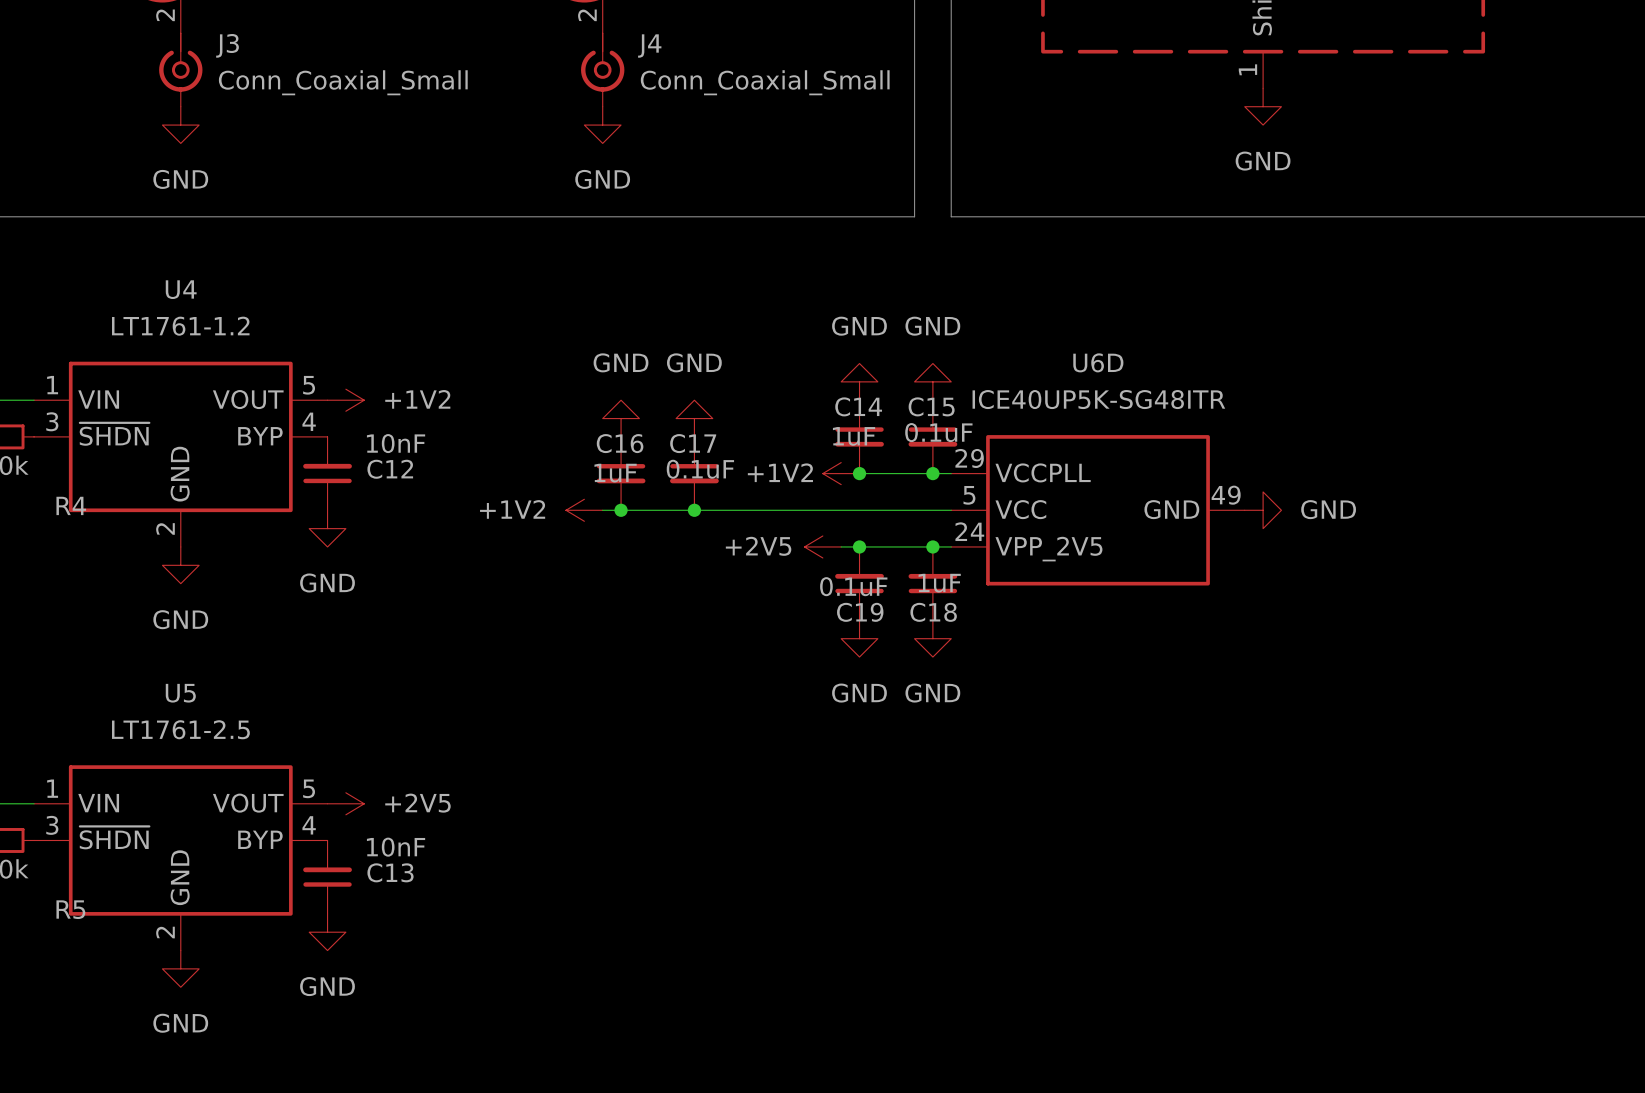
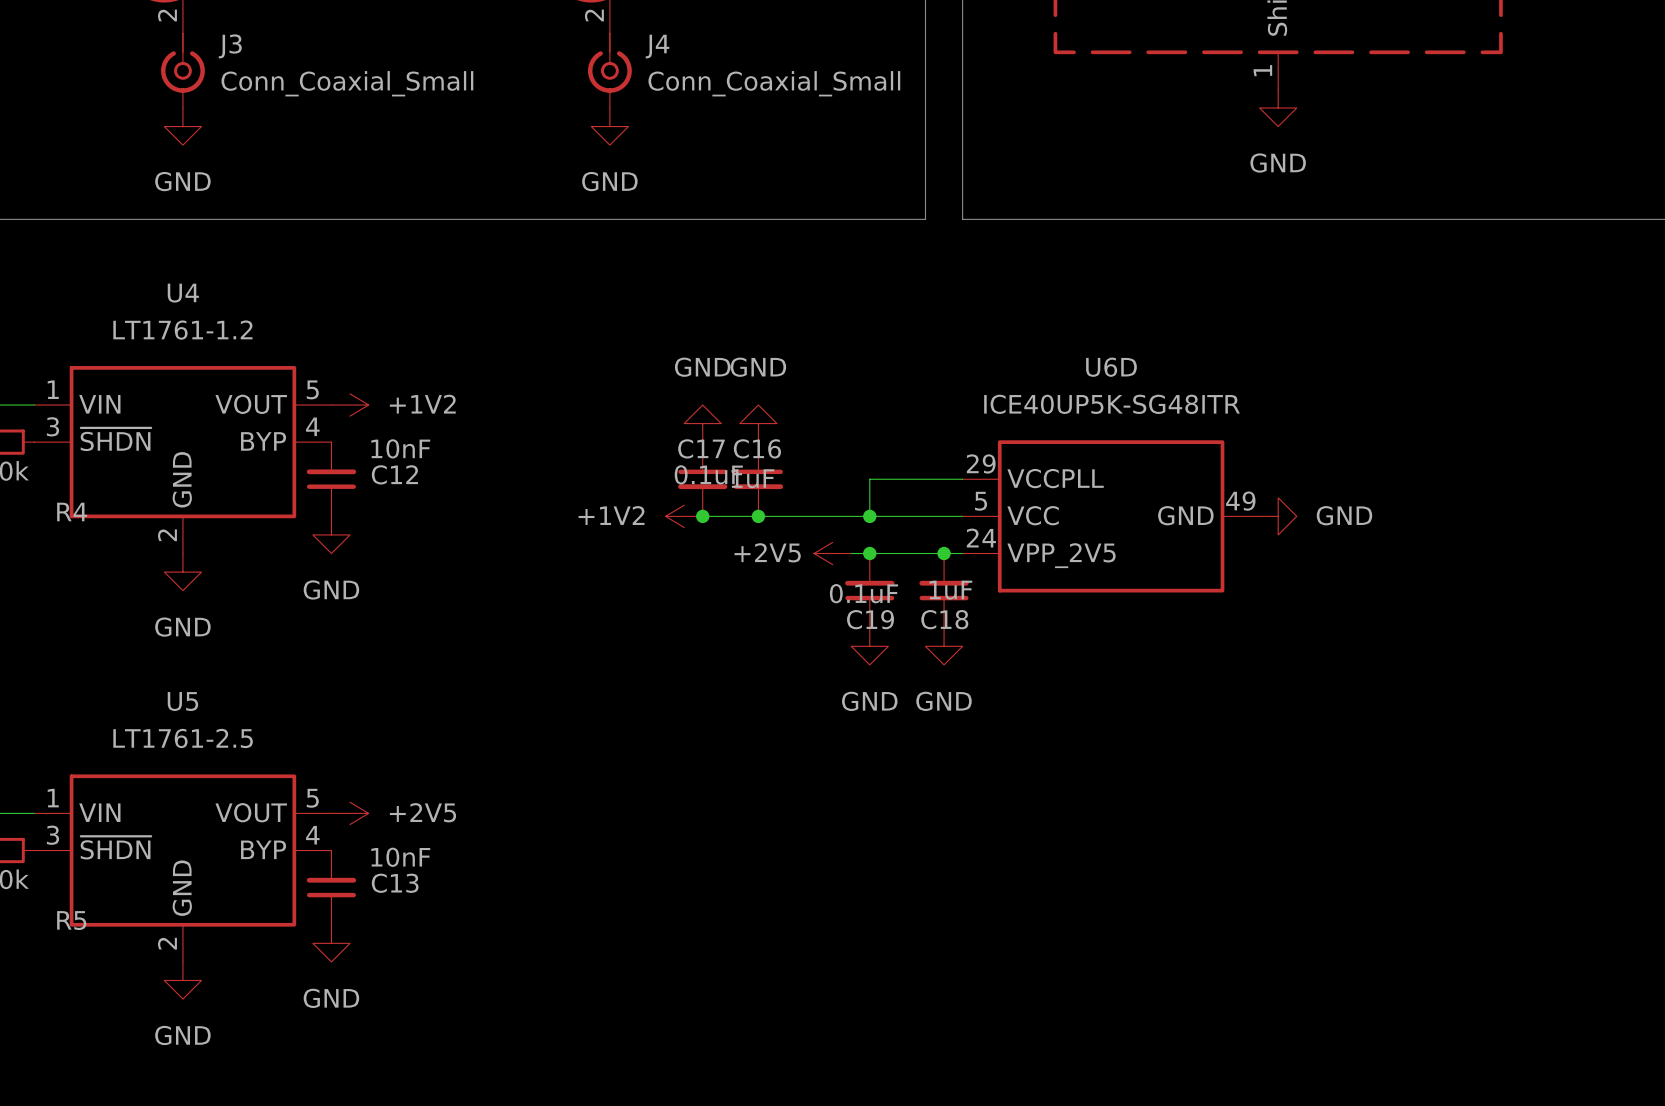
power symbol: GND (859, 381) -> none
power symbol: GND (932, 381) -> none
power symbol: GND (621, 418) -> none
power symbol: none -> GND (758, 423)
C14: 1uF (859, 436) -> none
C15: 0.1uF (932, 436) -> none
C16 position: (621, 473) -> (758, 479)
power symbol: +1V2 (841, 473) -> none
wire: none -> (869, 479) (869, 516)
junction position: (859, 473) -> (869, 516)
junction: (932, 473) -> none
power symbol: +1V2 (584, 510) -> none
wire: (602, 510) (694, 510) -> none
junction: (621, 510) -> none
power symbol: none -> +1V2 (684, 516)
junction: none -> (758, 516)

